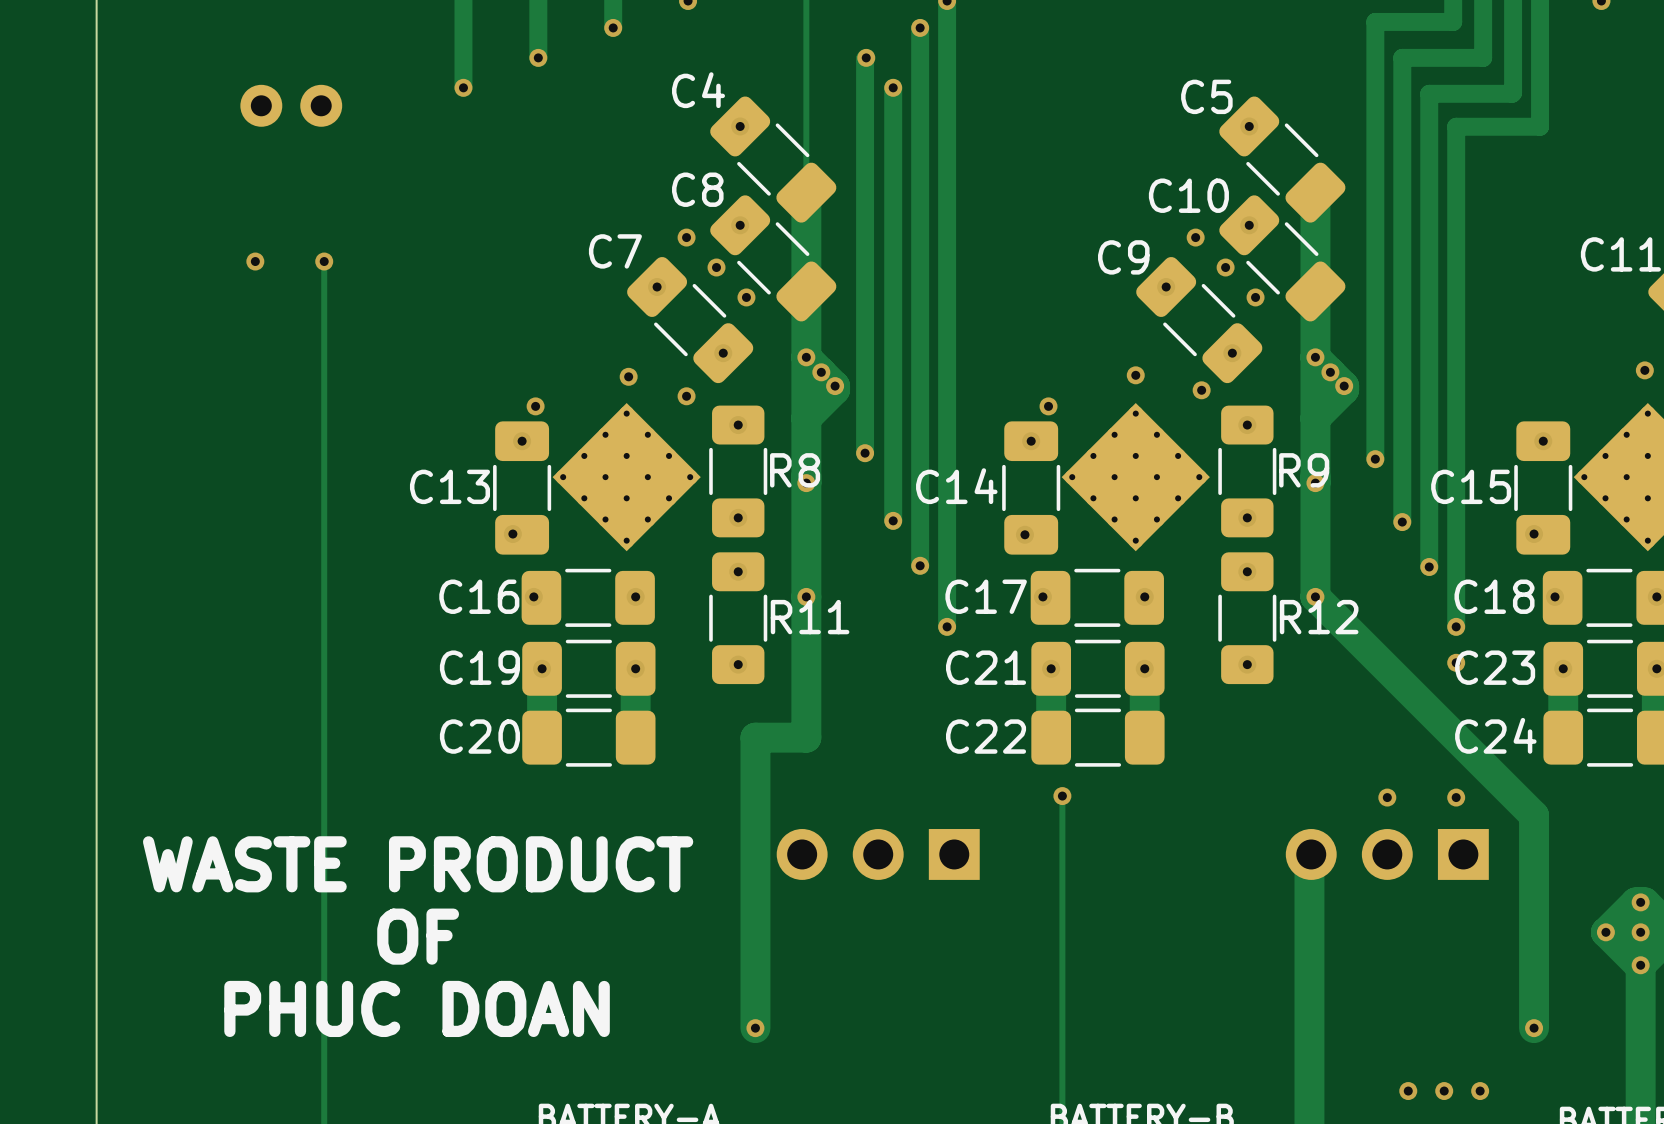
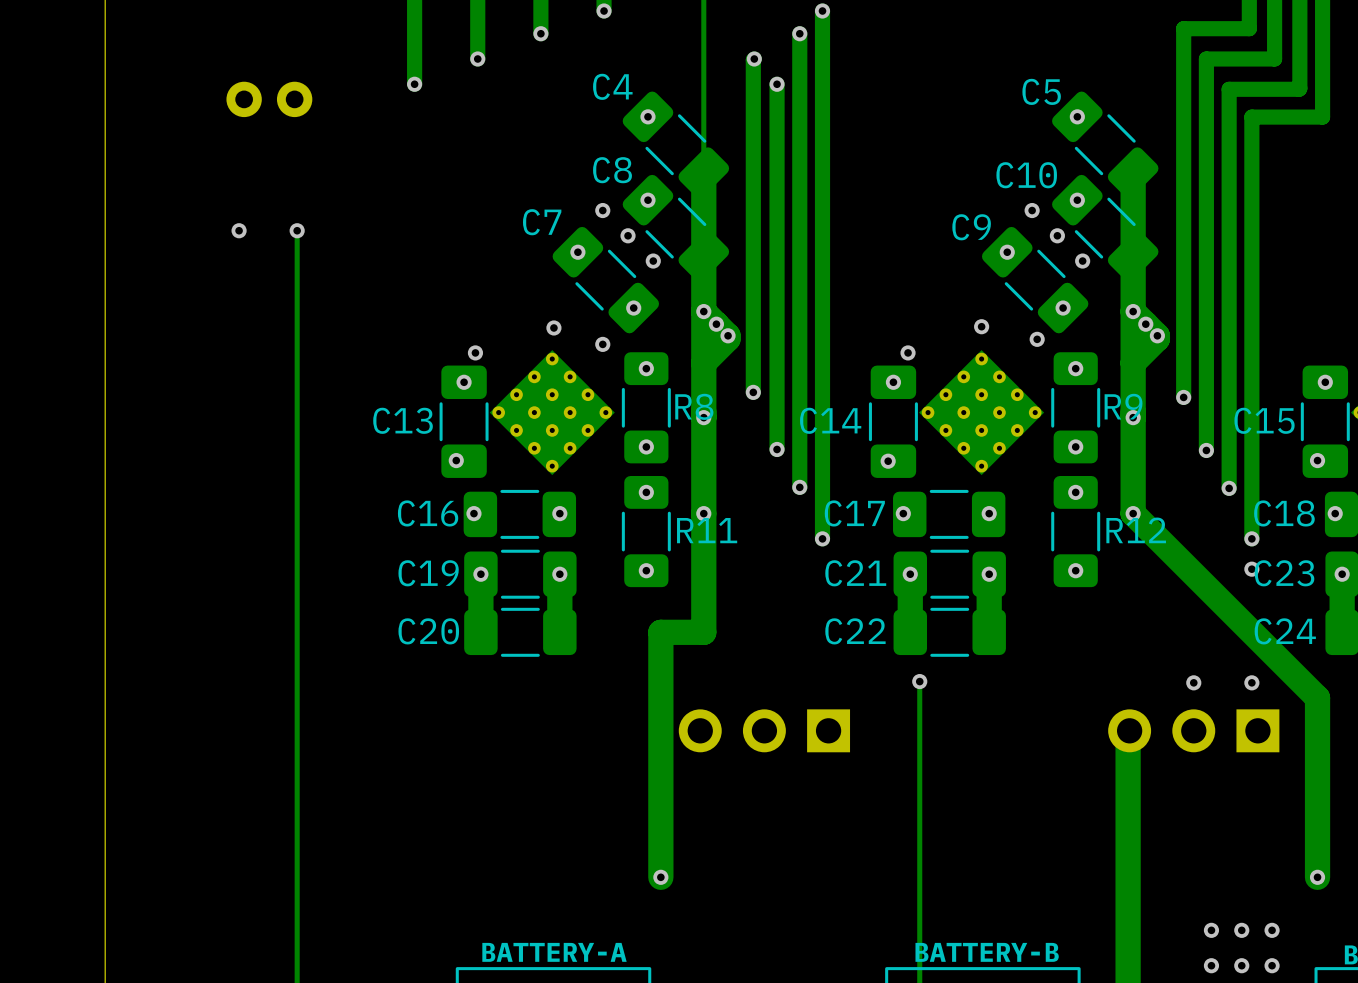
text: WASTE PRODUCT (418, 864) -> none
text: OF (418, 936) -> none
text: PHUC DOAN (417, 1008) -> none

